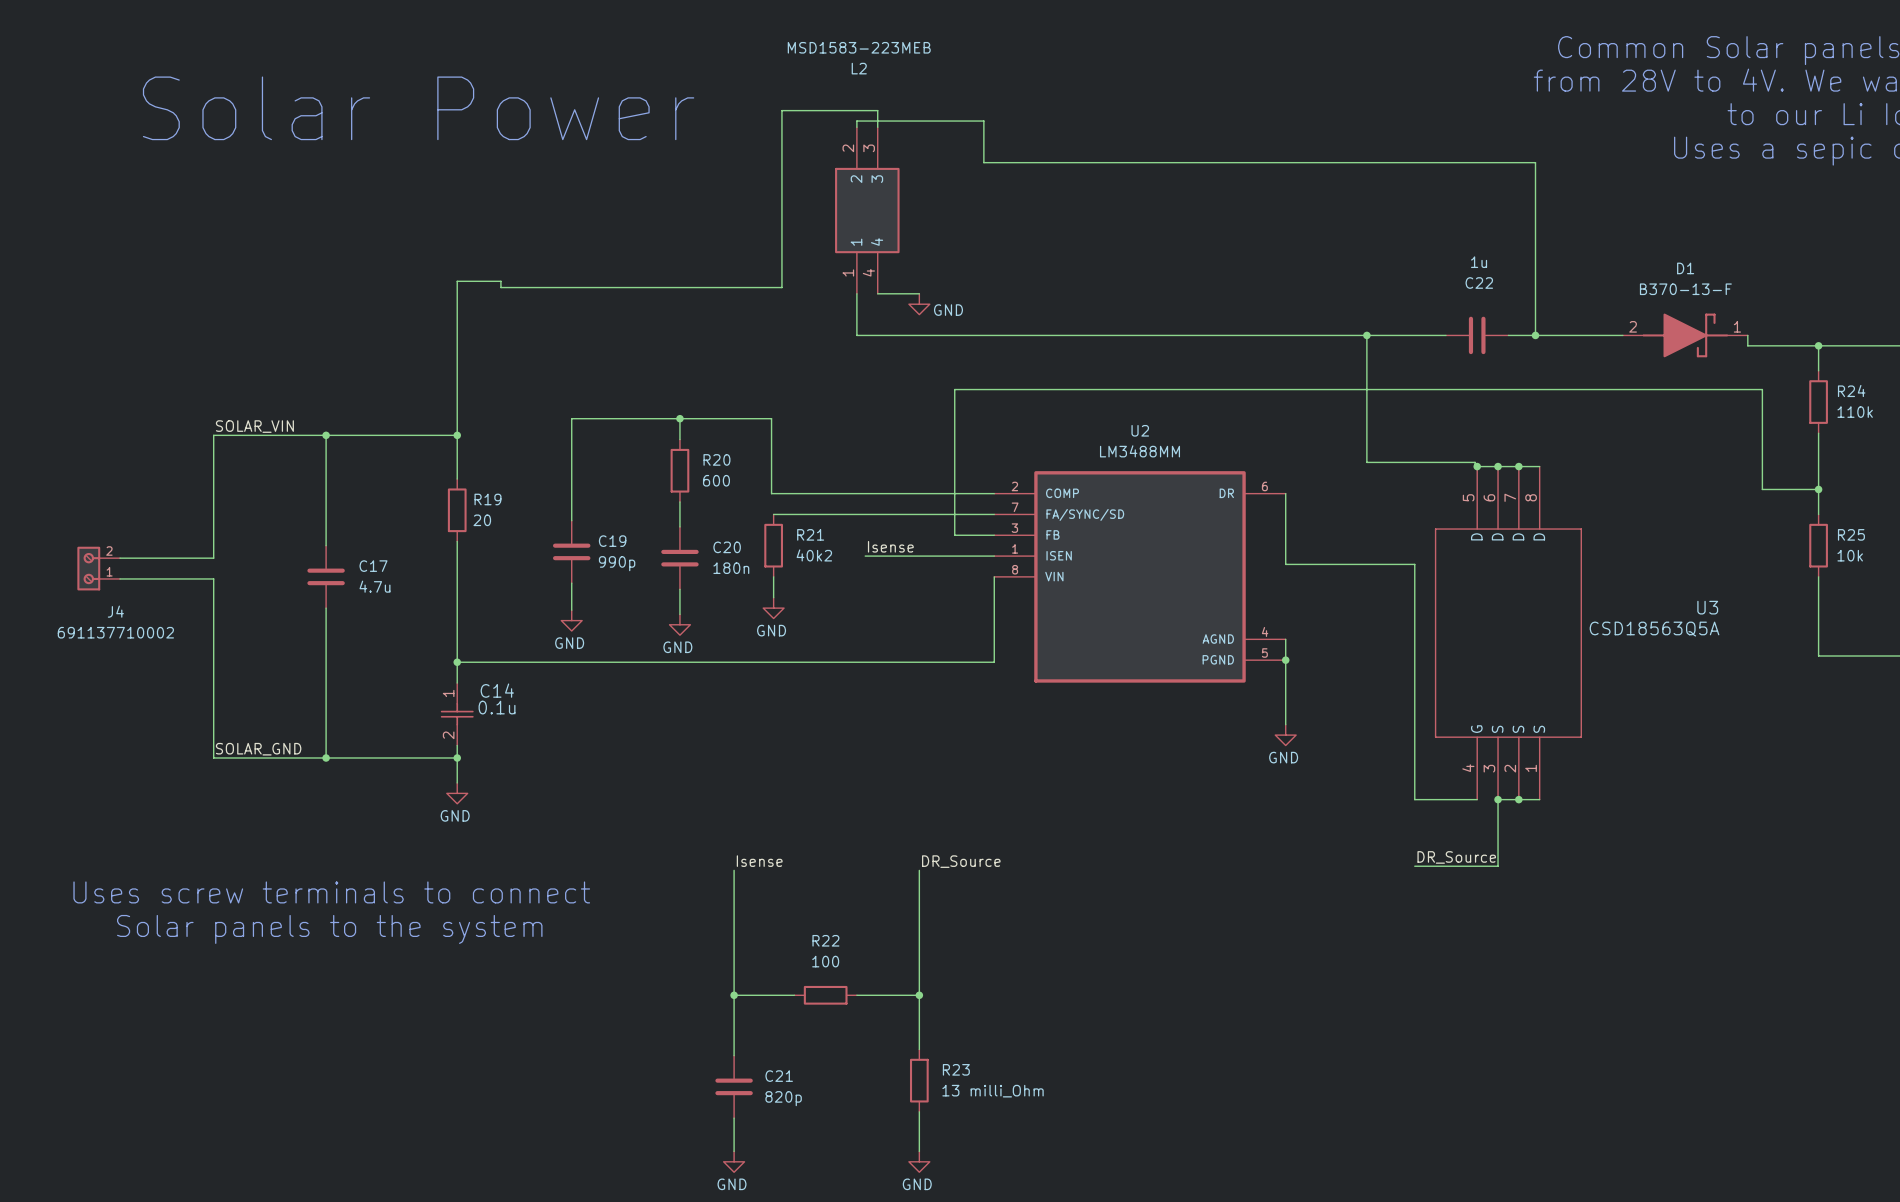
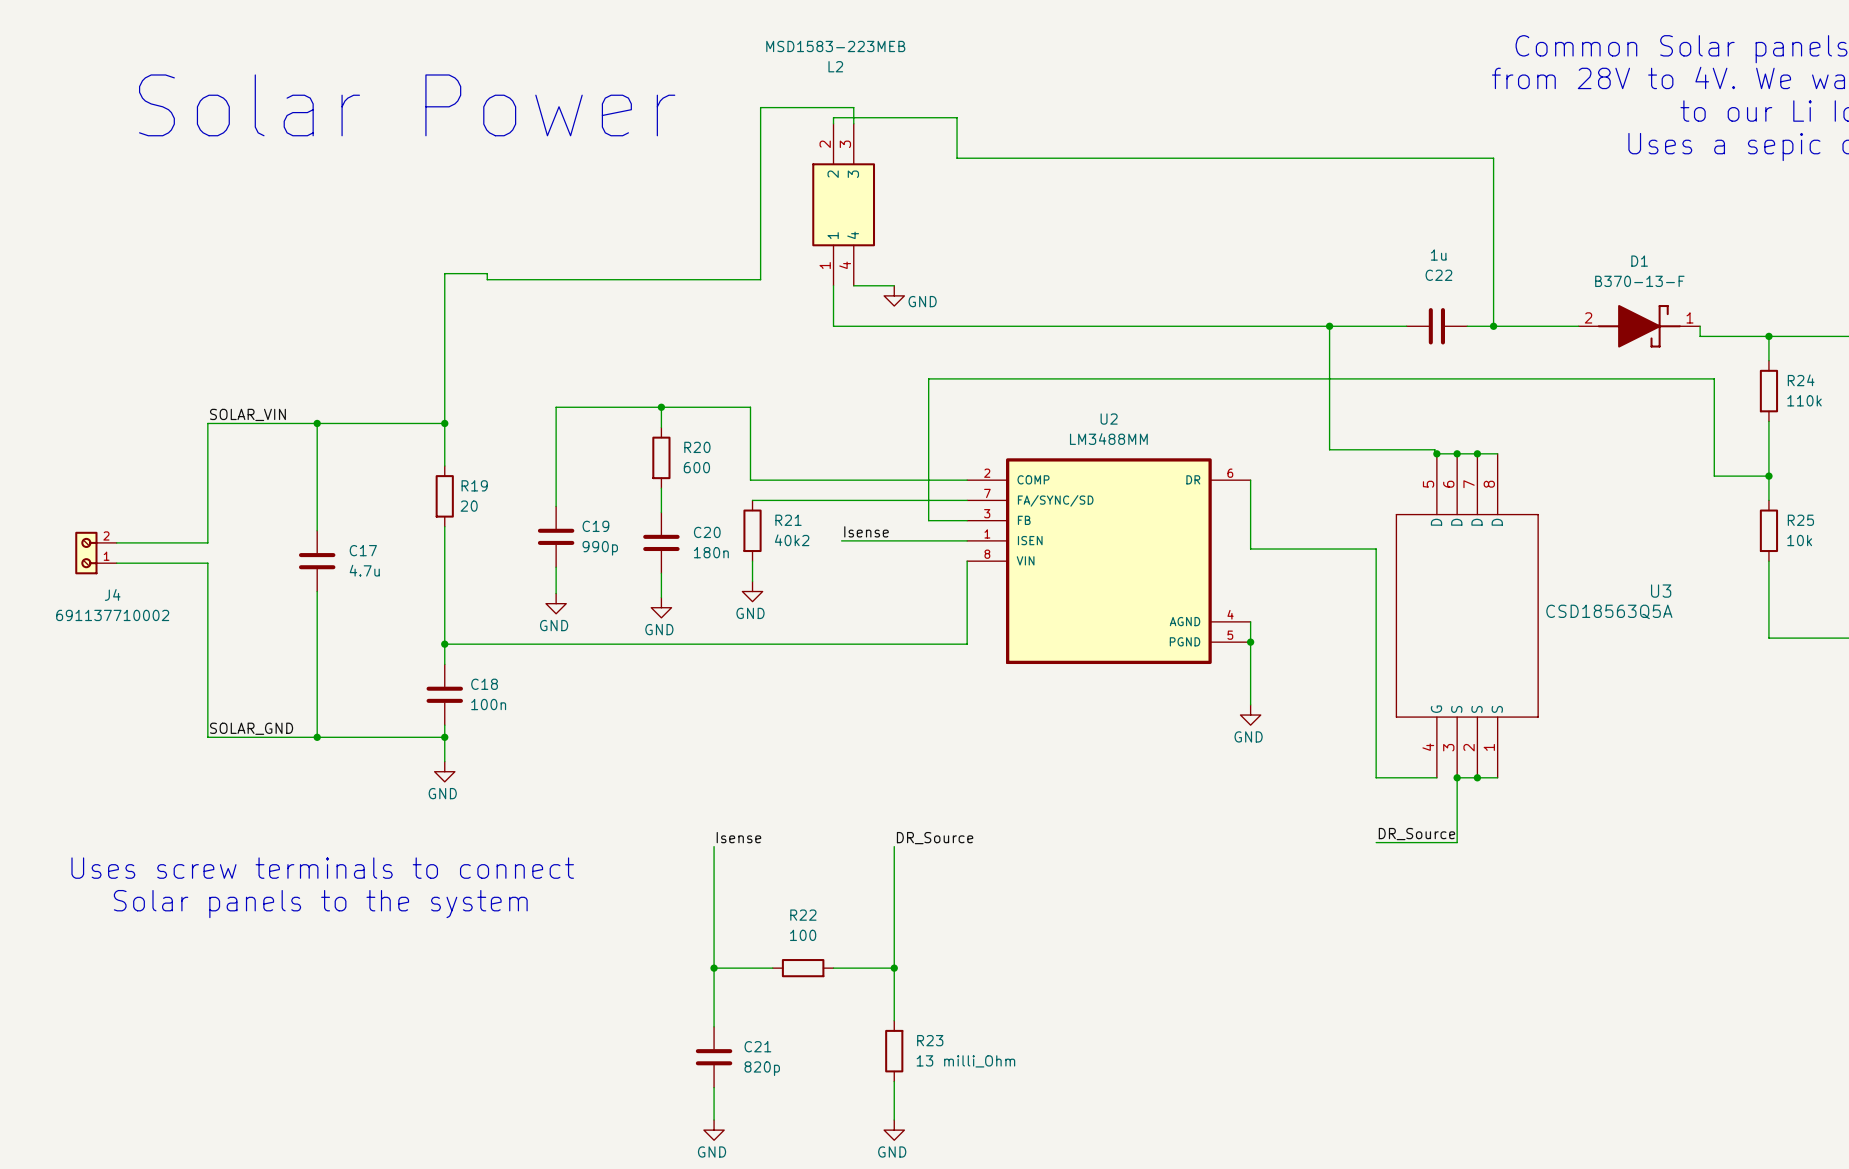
C14: 0.1u (457, 714) -> none
C18: none -> 100n (444, 694)

